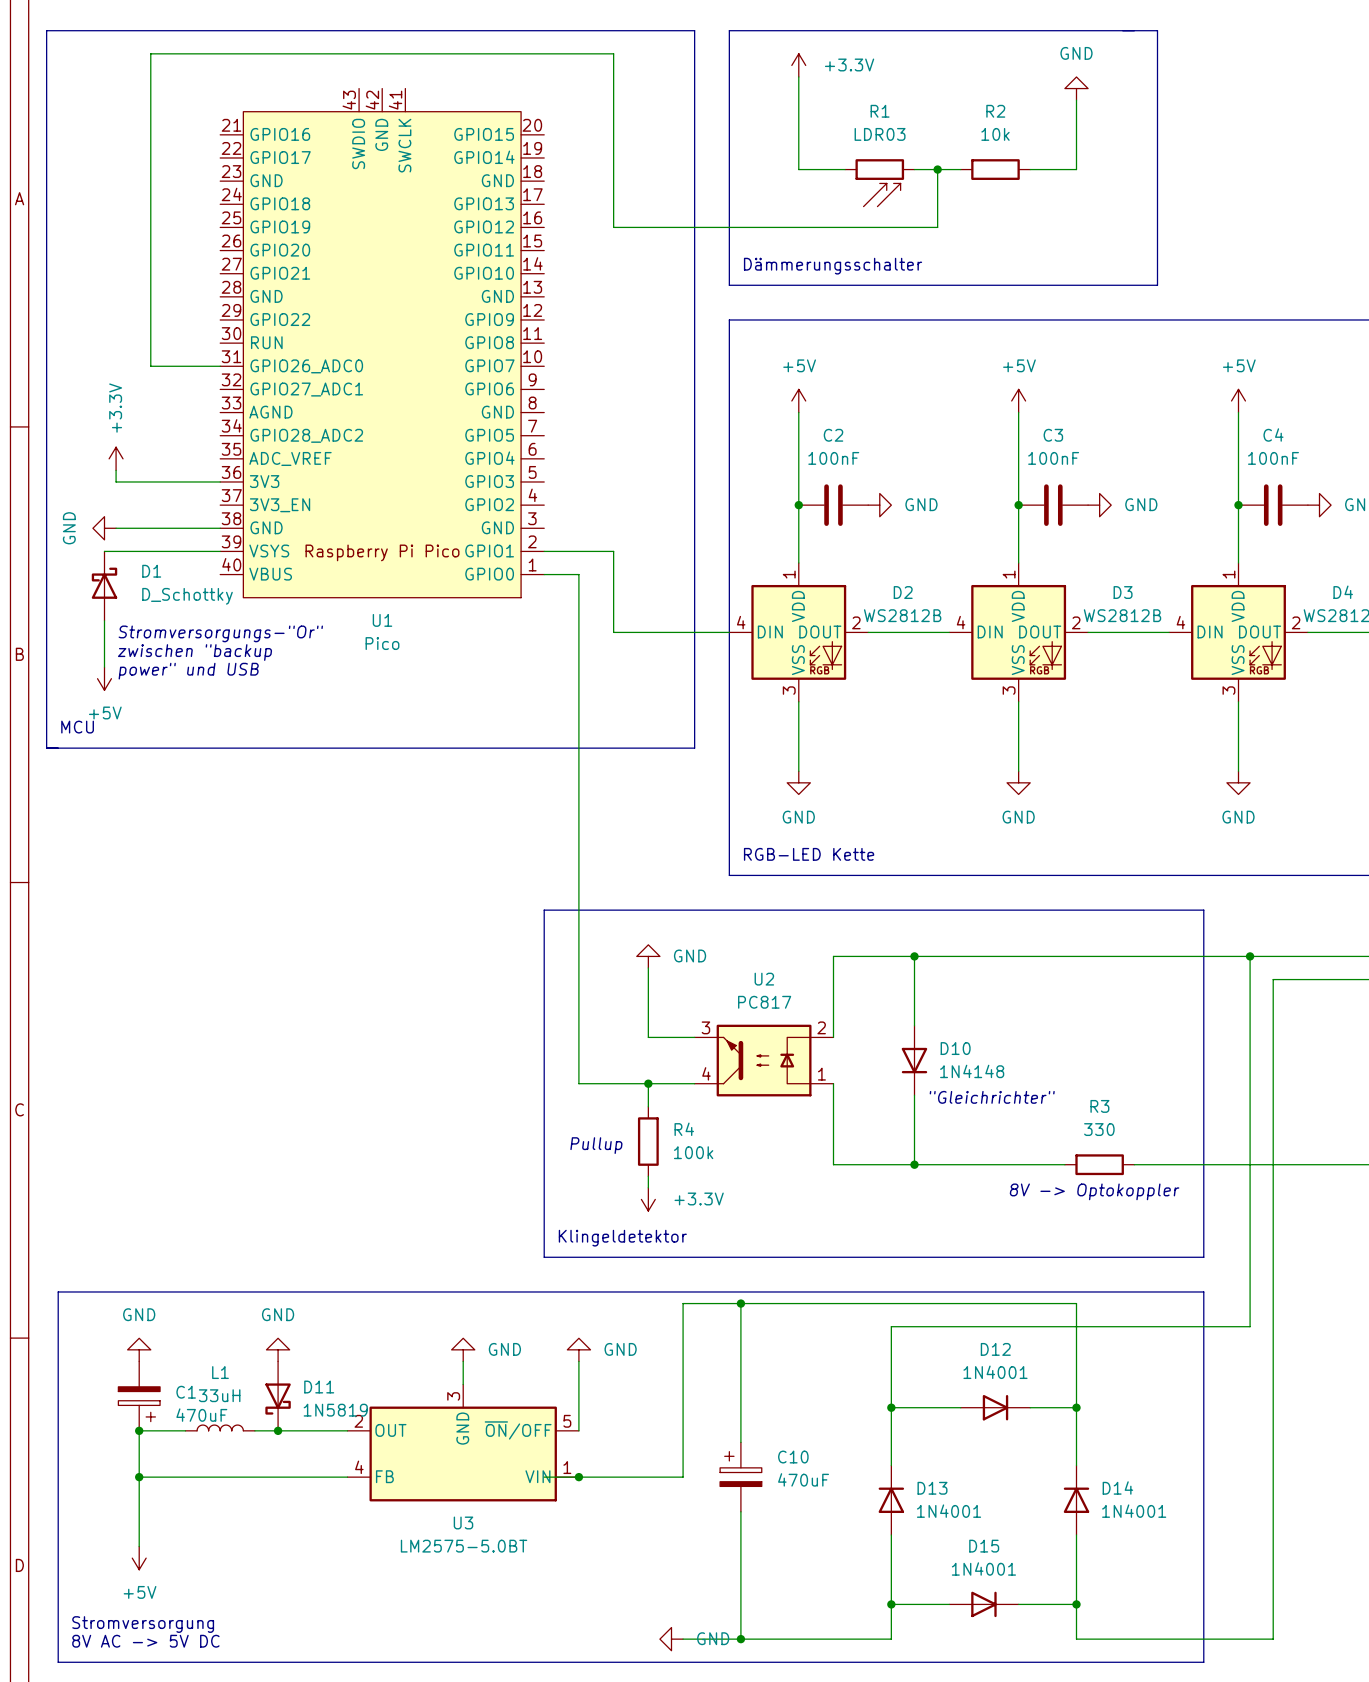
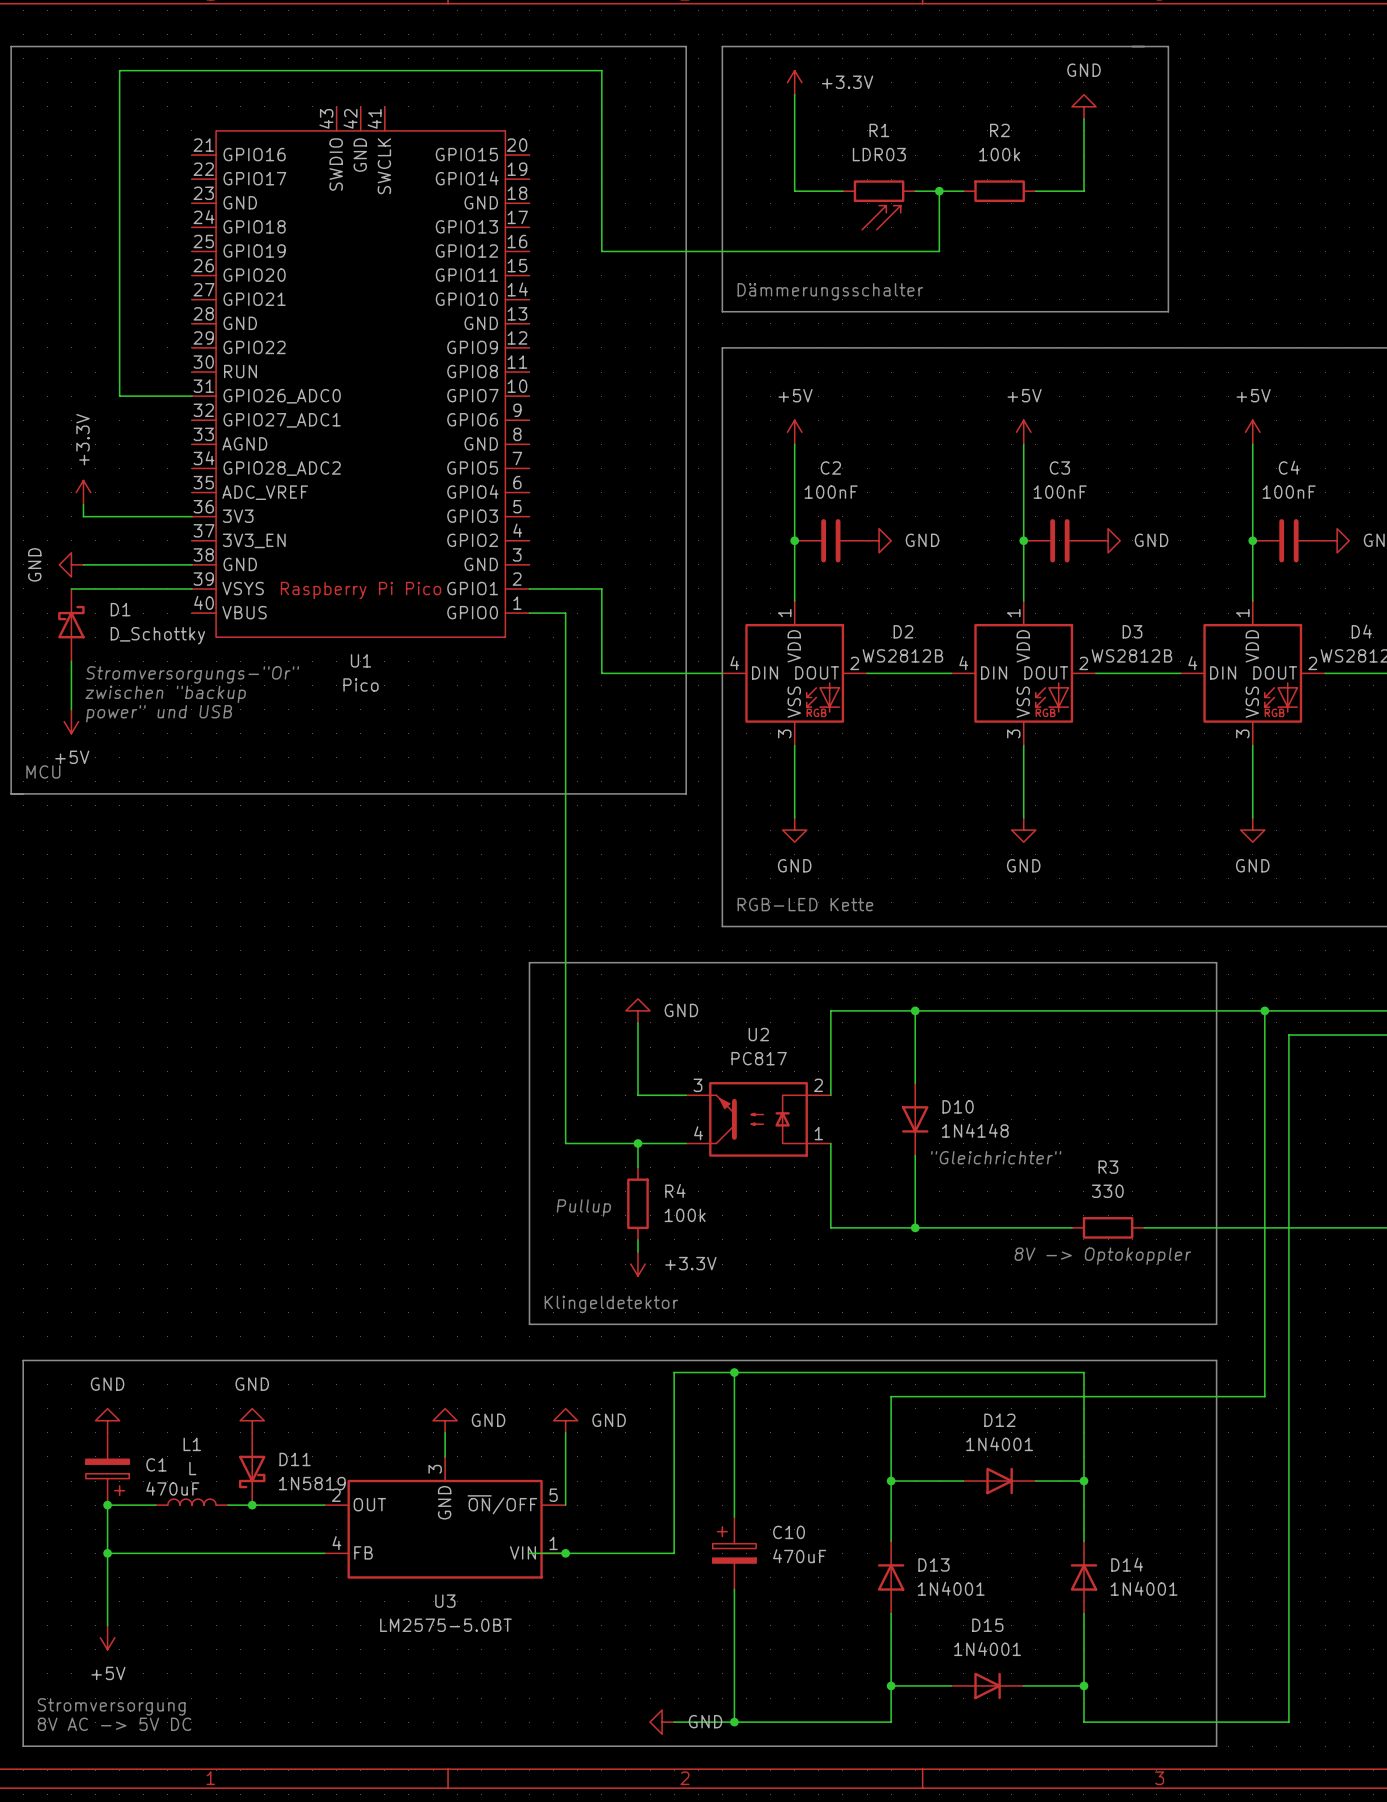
R2 value: 10k (995, 134) -> 100k (999, 154)
L1 value: 33uH (219, 1395) -> L (192, 1468)

